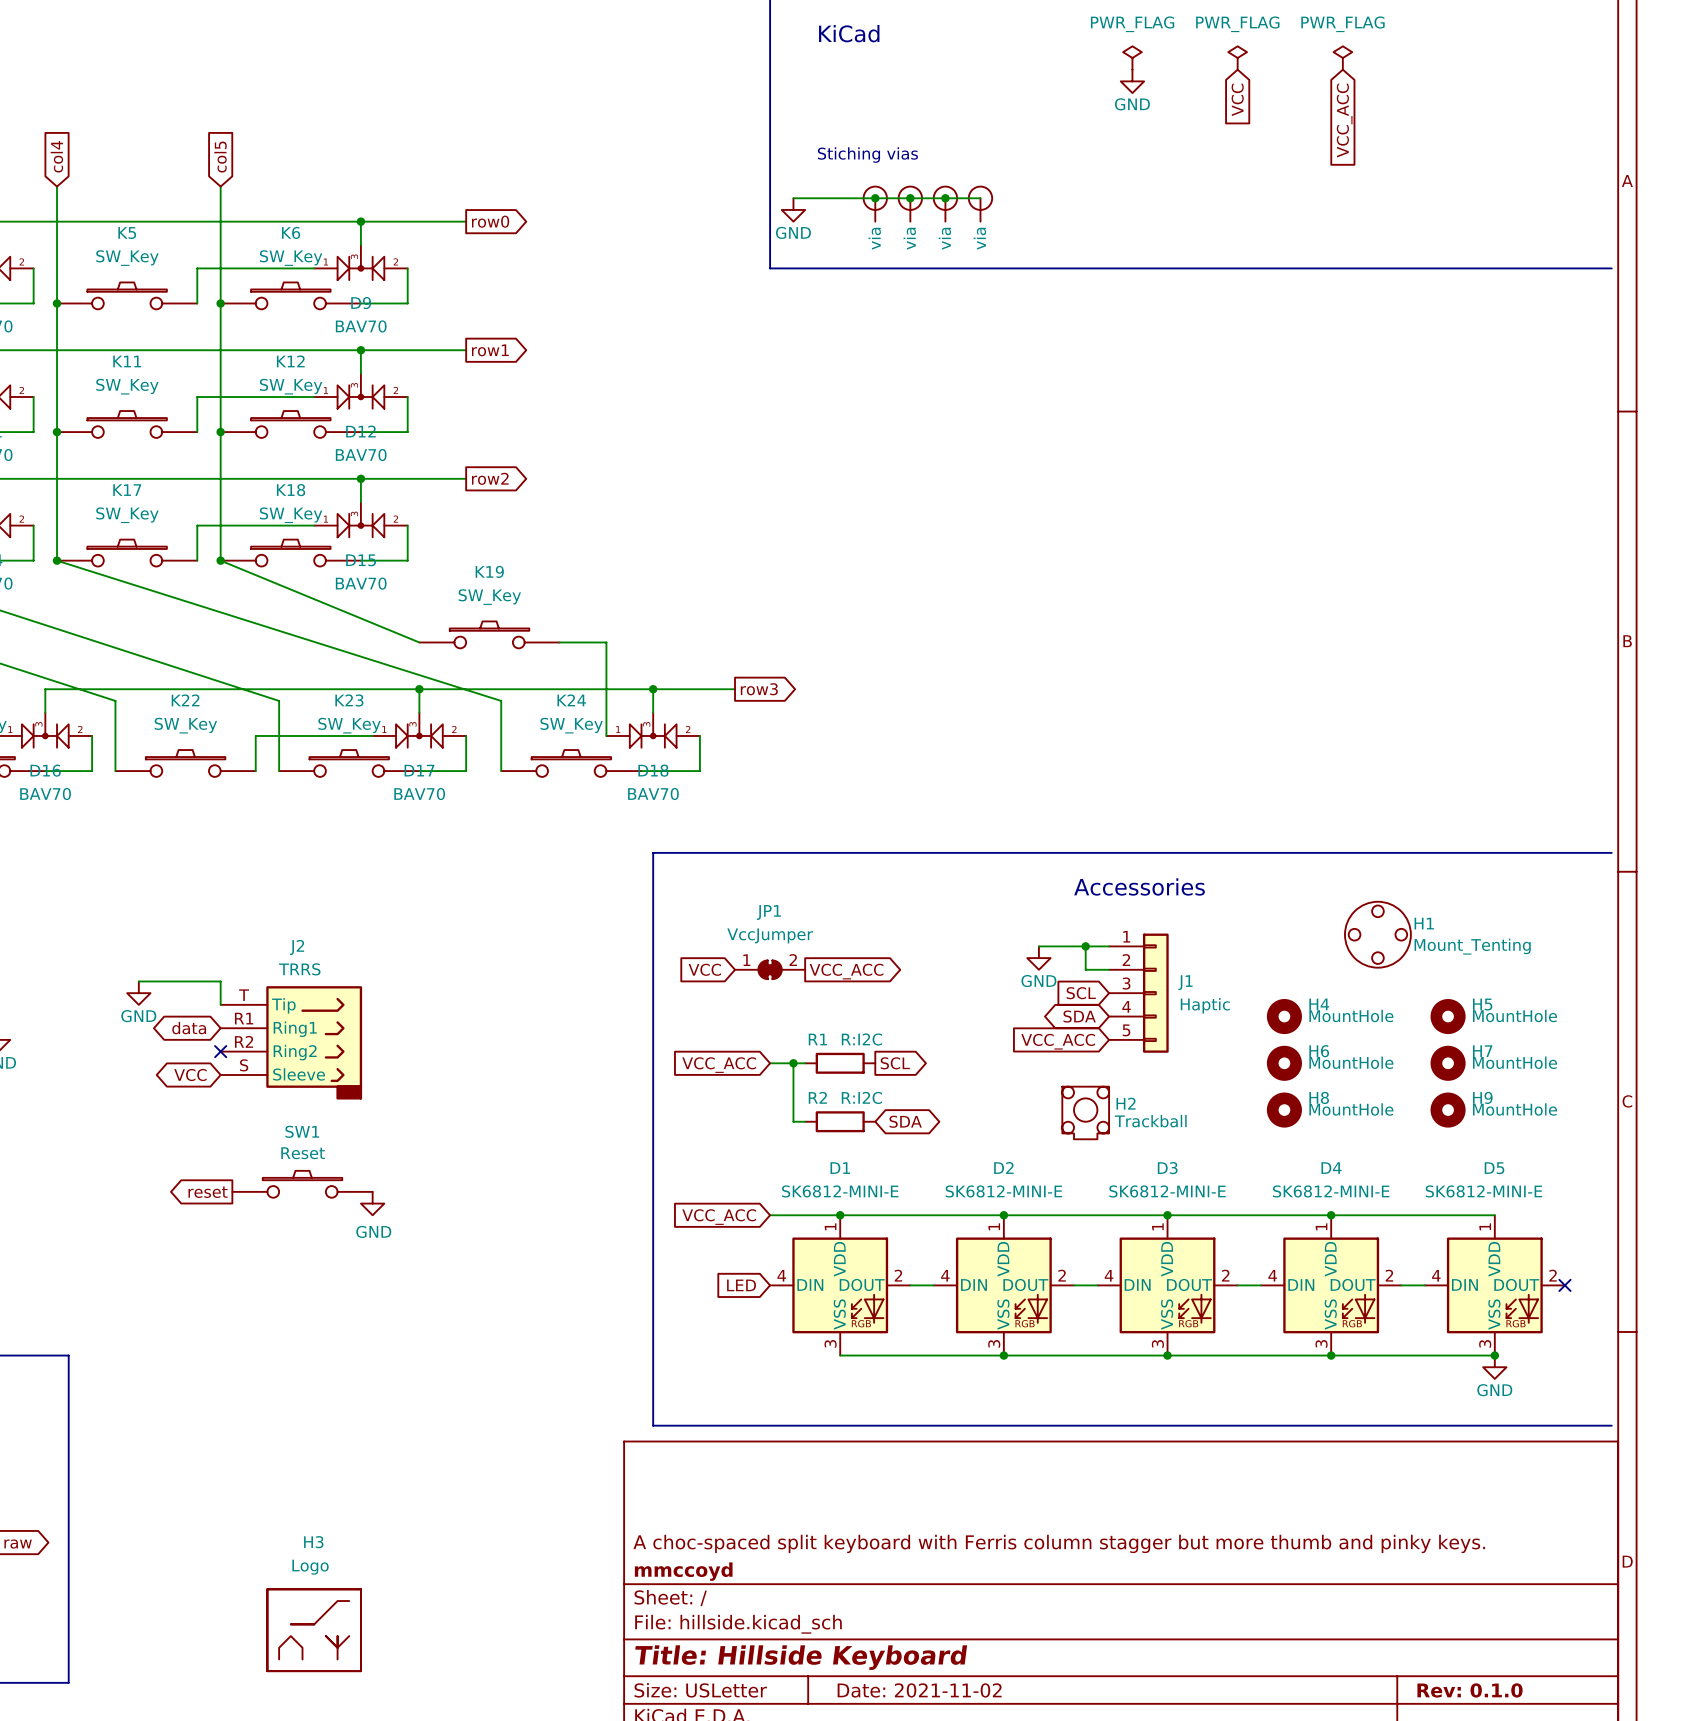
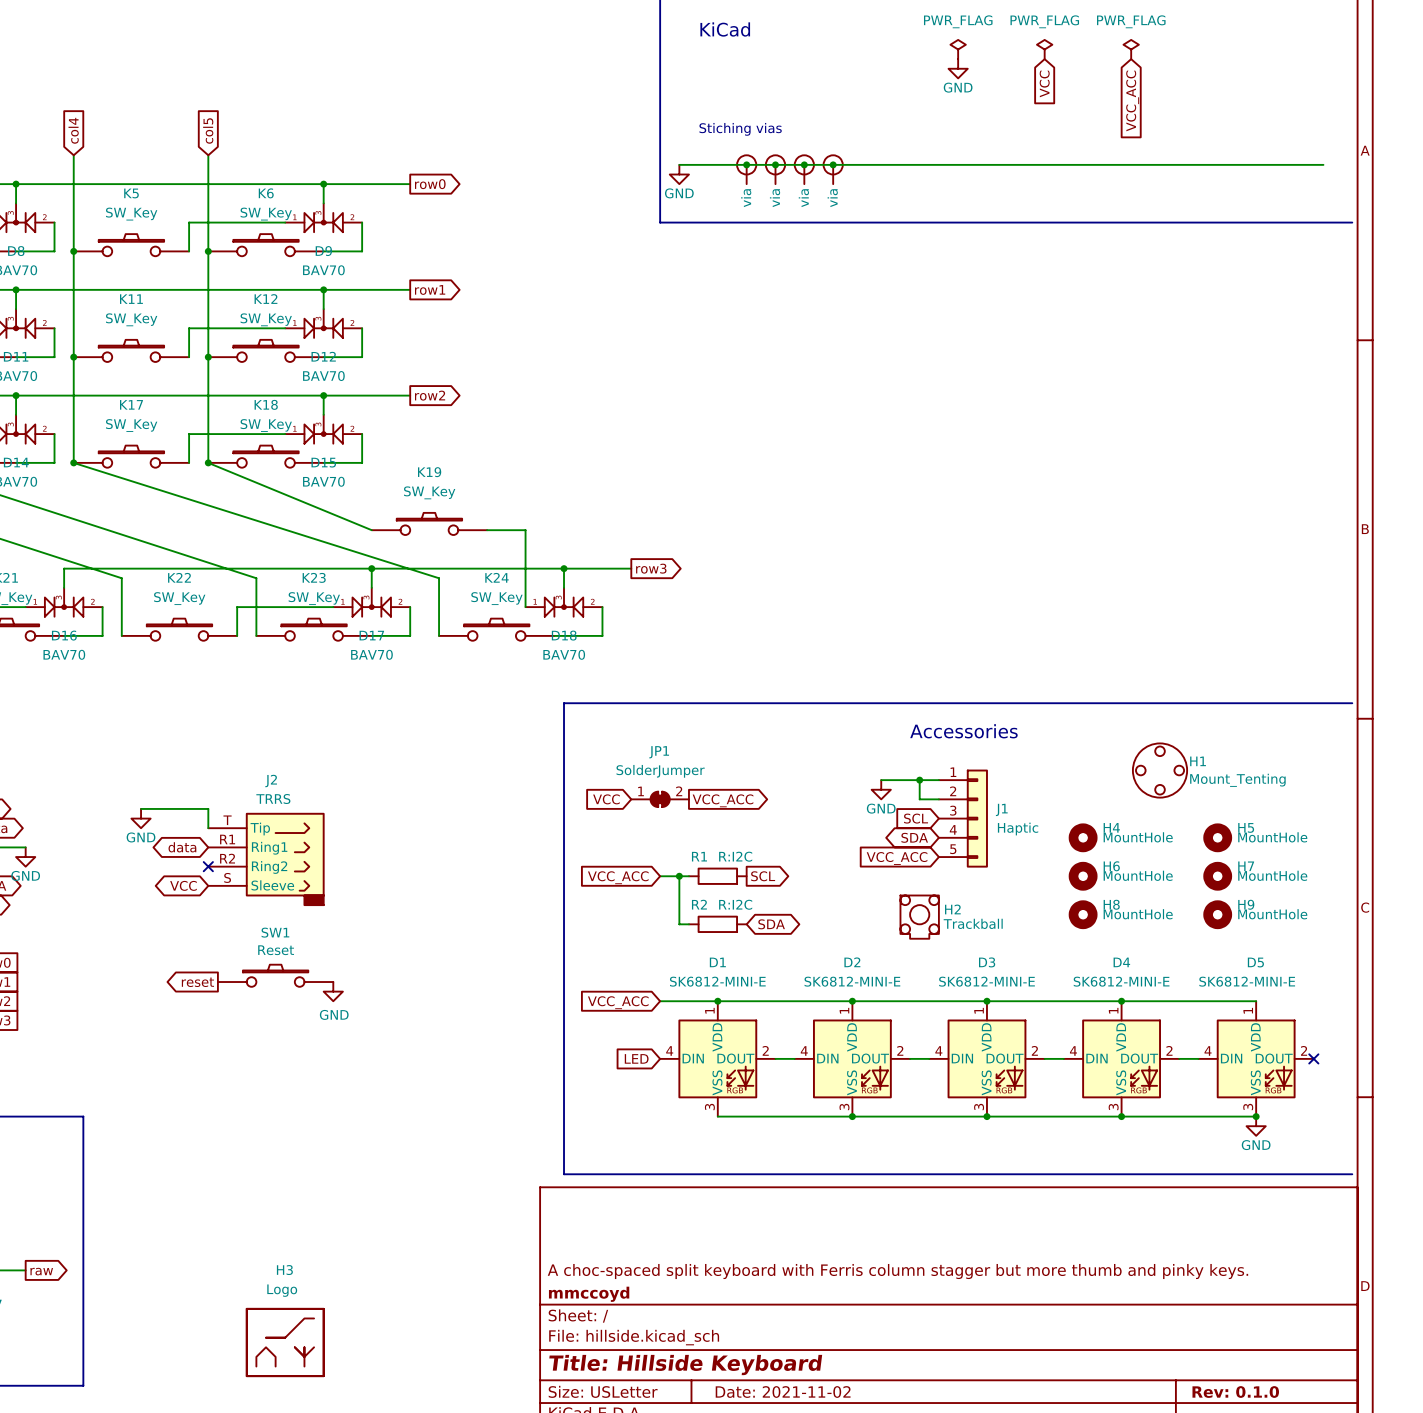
wire: none -> (833, 164) (1323, 164)
junction: none -> (833, 164)
JP1 value: VccJumper (770, 935) -> SolderJumper (660, 771)

